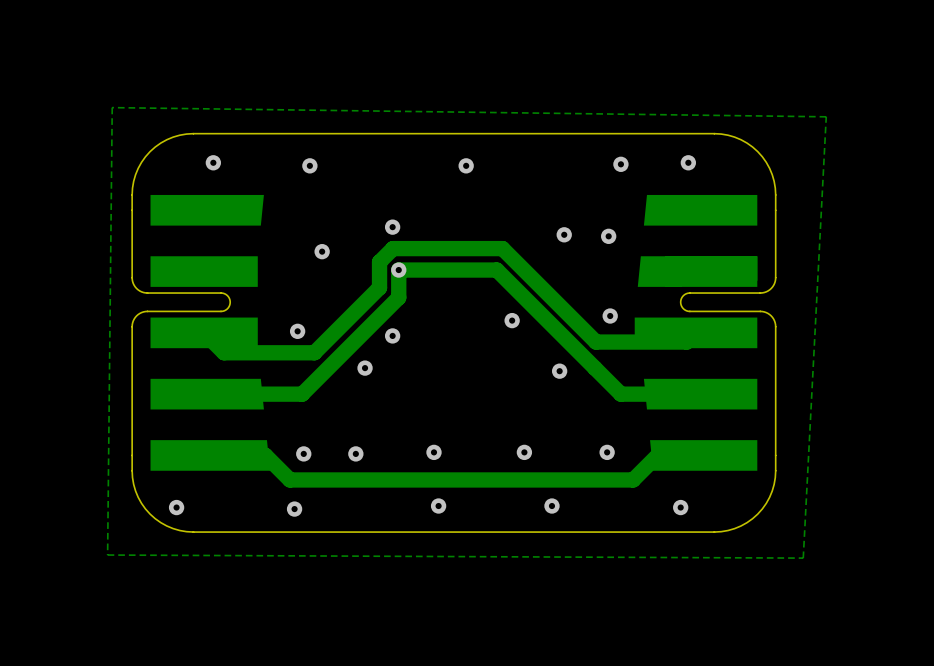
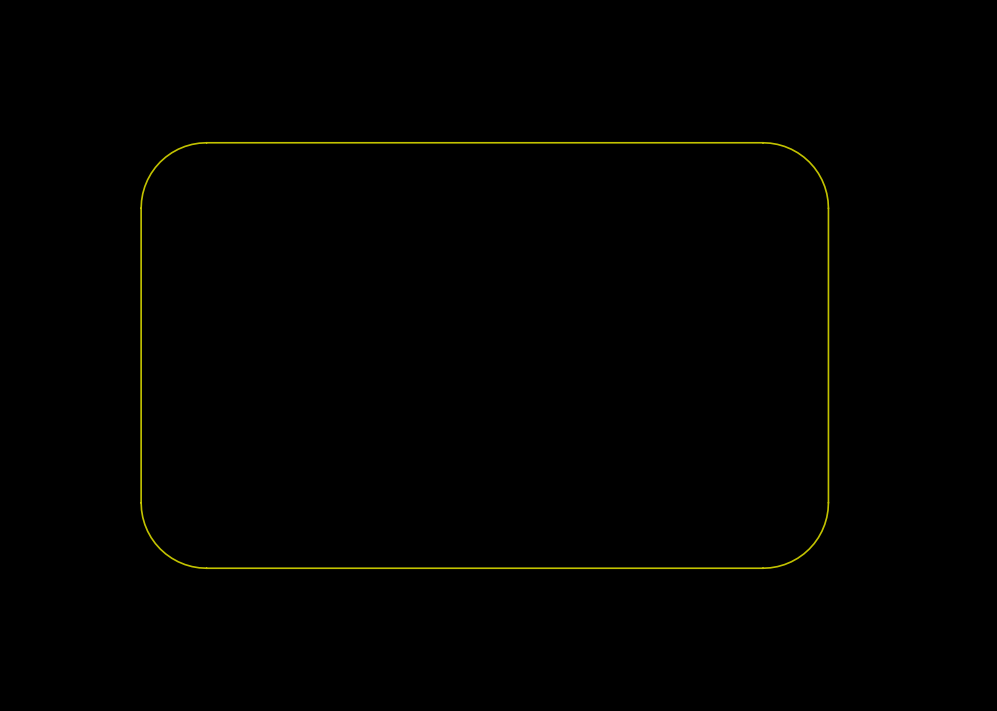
zone outline: (112, 107) (826, 116) (803, 558) (107, 555) (112, 107) -> none
via: (213, 162) -> none
via: (688, 162) -> none
via: (620, 164) -> none
via: (309, 165) -> none
via: (466, 165) -> none
board edge: none -> (141, 224) (141, 486)
board edge: none -> (828, 224) (828, 486)
via: (392, 227) -> none
via: (564, 234) -> none
via: (608, 236) -> none
via: (322, 251) -> none
via: (398, 270) -> none
via: (610, 316) -> none
via: (512, 320) -> none
via: (297, 331) -> none
part: (200, 332) -> none
track: (696, 332) (686, 342) (596, 342) (502, 248) (393, 248) (379, 262) (379, 287) (314, 352) (224, 352) (204, 332) -> none
part: (705, 332) -> none
via: (392, 335) -> none
via: (365, 368) -> none
via: (559, 371) -> none
track: (702, 394) (620, 394) (496, 270) (398, 270) (398, 297) (302, 394) (205, 394) -> none
via: (433, 452) -> none
via: (524, 452) -> none
via: (607, 452) -> none
via: (303, 453) -> none
via: (355, 453) -> none
track: (705, 455) (657, 455) (633, 479) (289, 479) (265, 455) (208, 455) -> none
via: (438, 506) -> none
via: (551, 506) -> none
via: (176, 507) -> none
via: (680, 507) -> none
via: (294, 509) -> none

